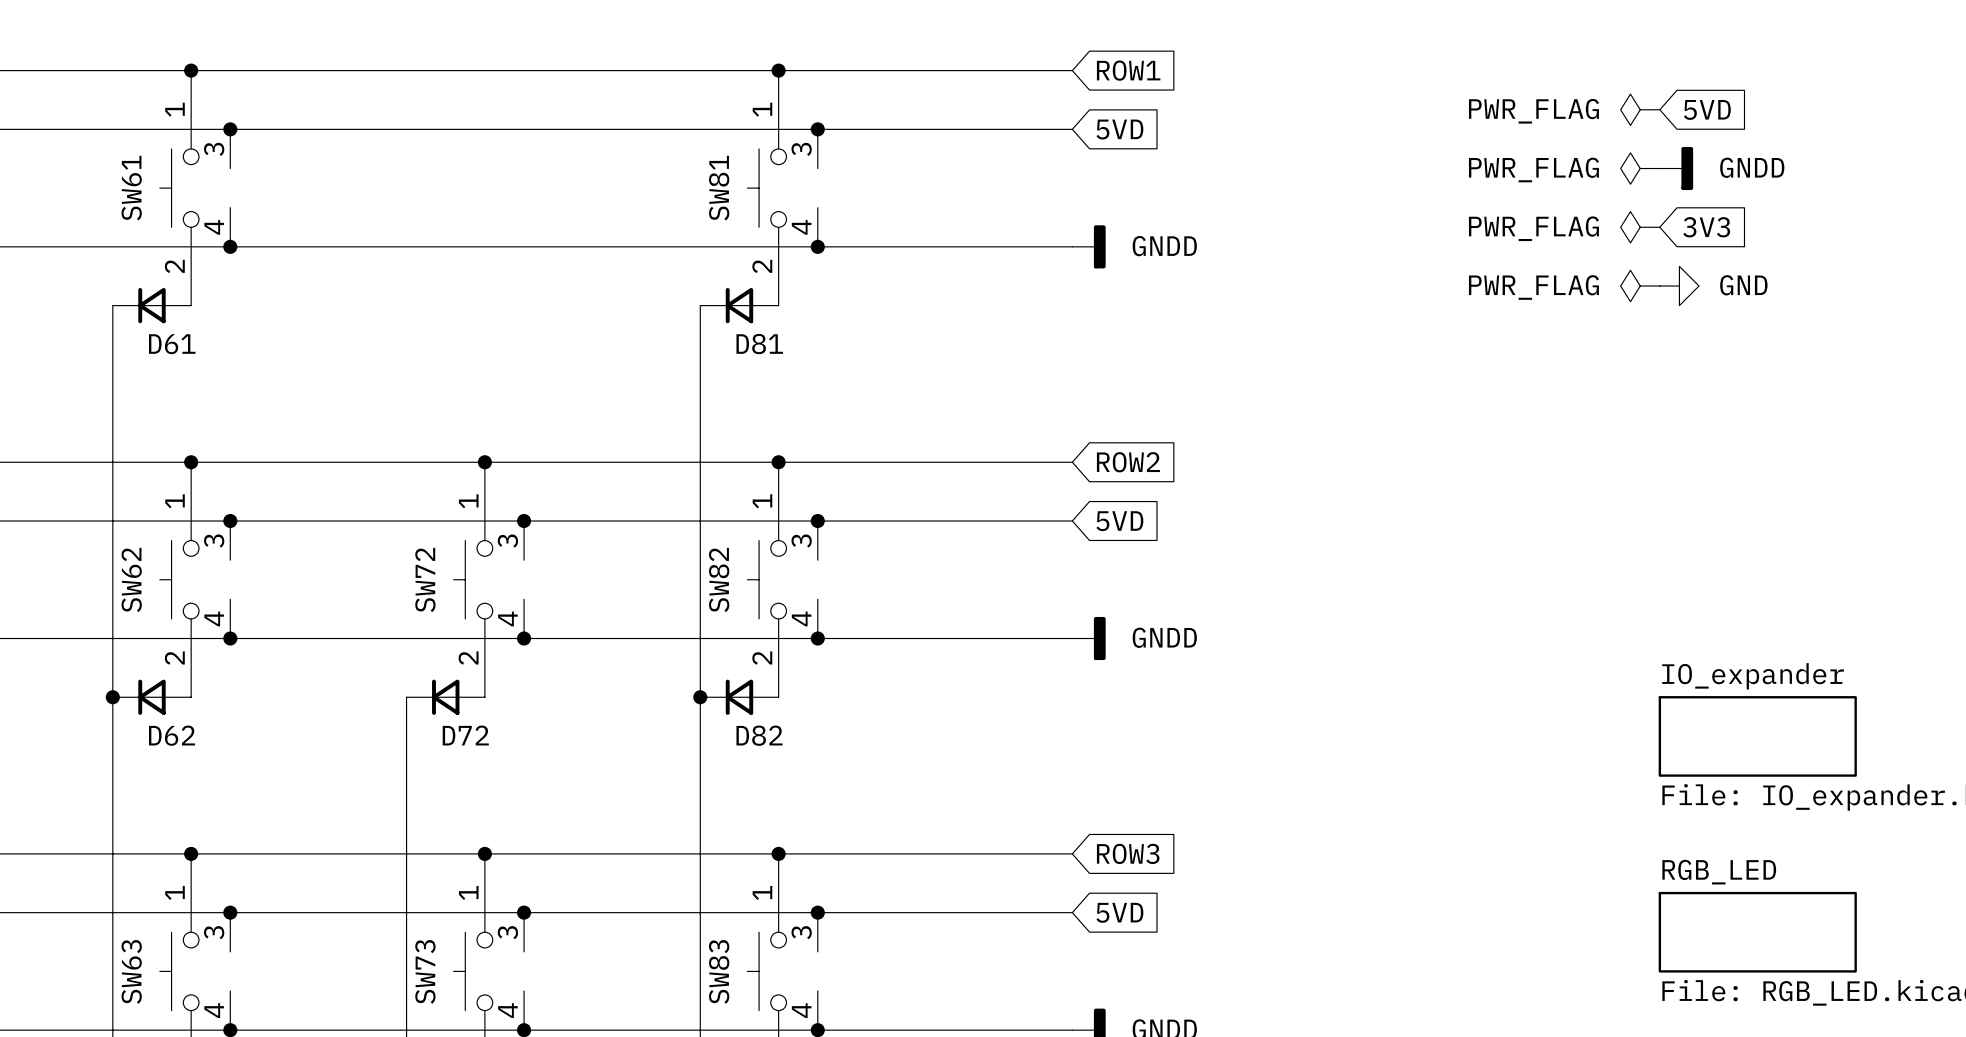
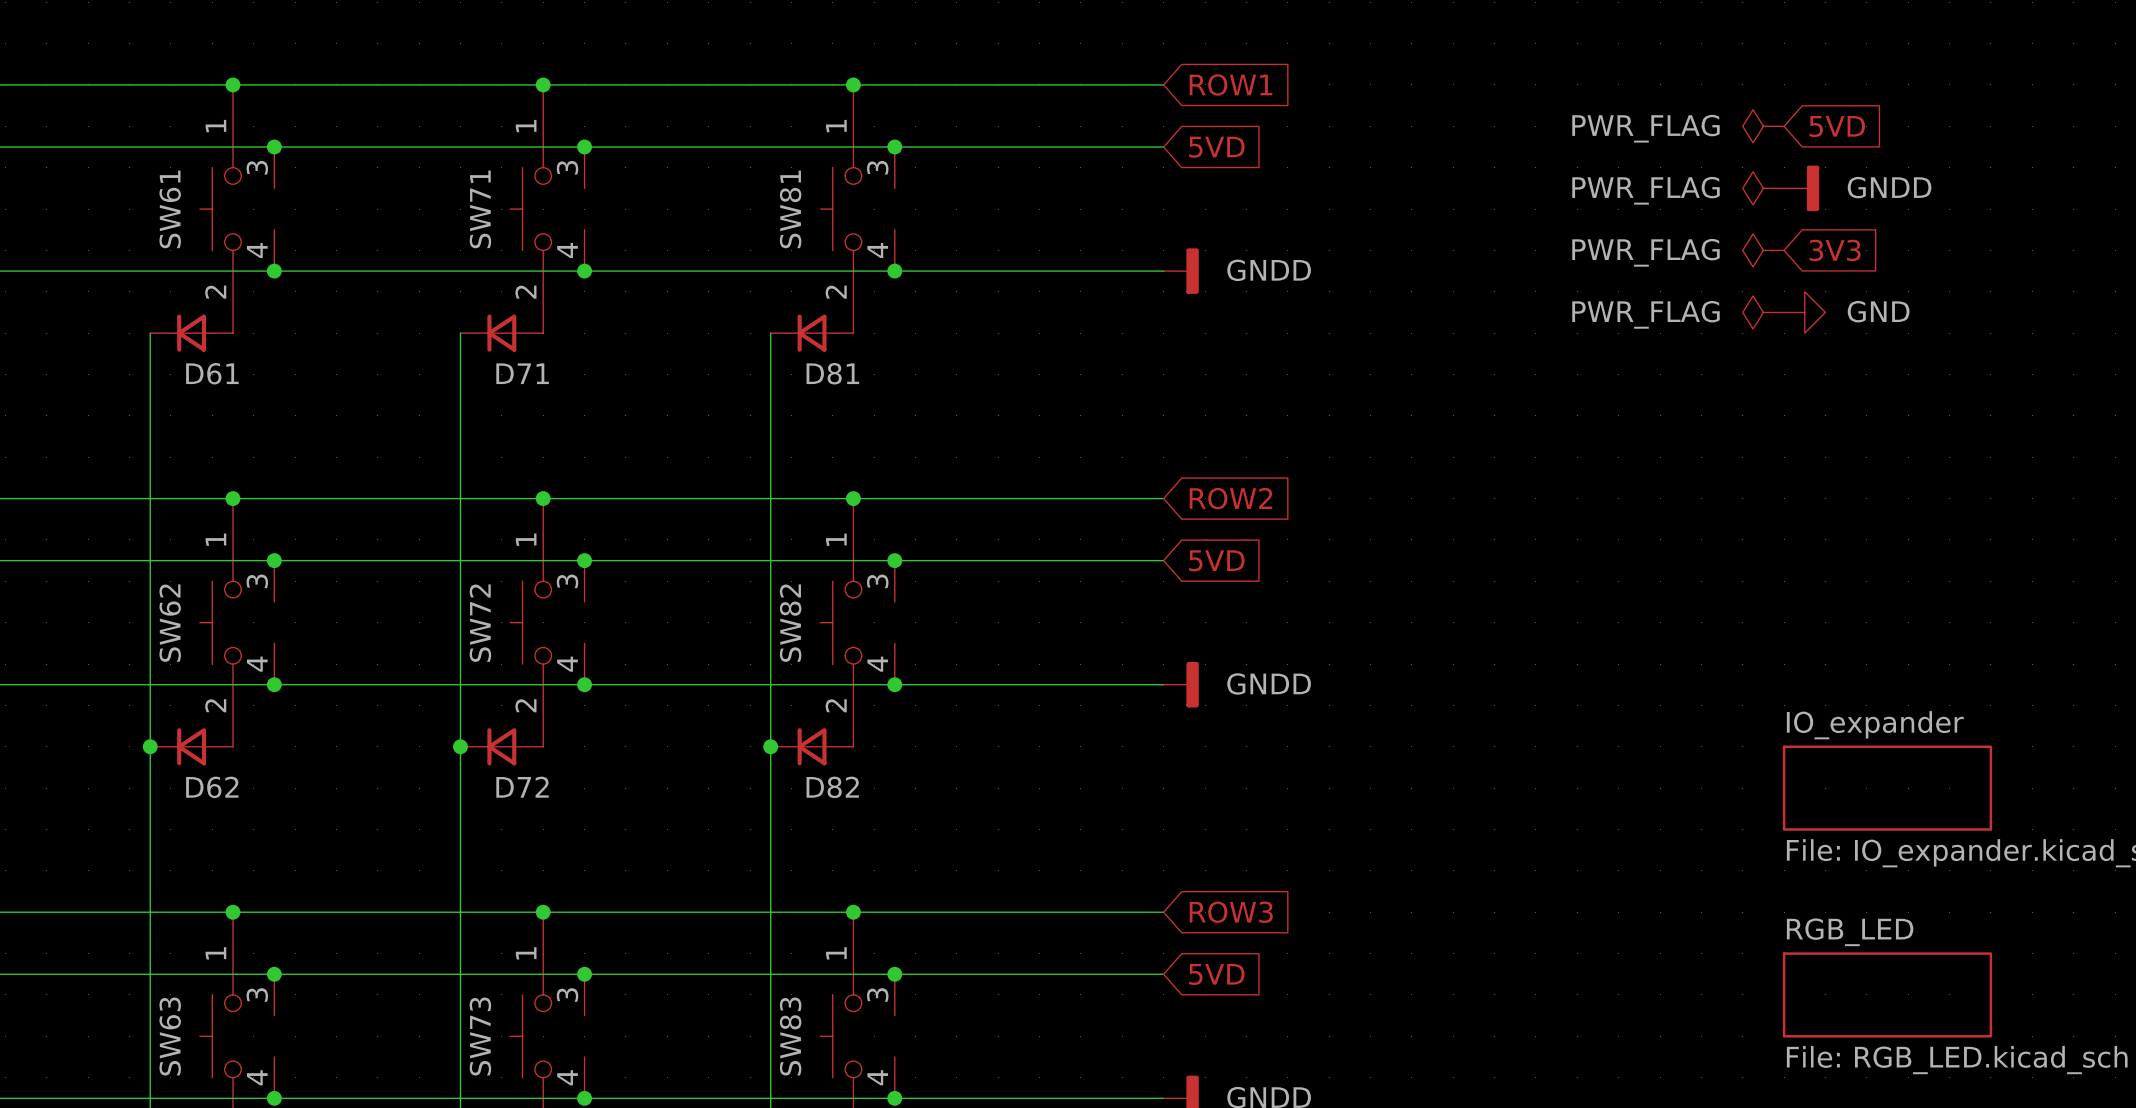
junction: none -> (543, 84)
junction: none -> (584, 147)
SW71: none -> (547, 209)
junction: none -> (584, 271)
wire: none -> (460, 333) (460, 746)
D71: none -> (501, 333)
junction: none -> (460, 746)

